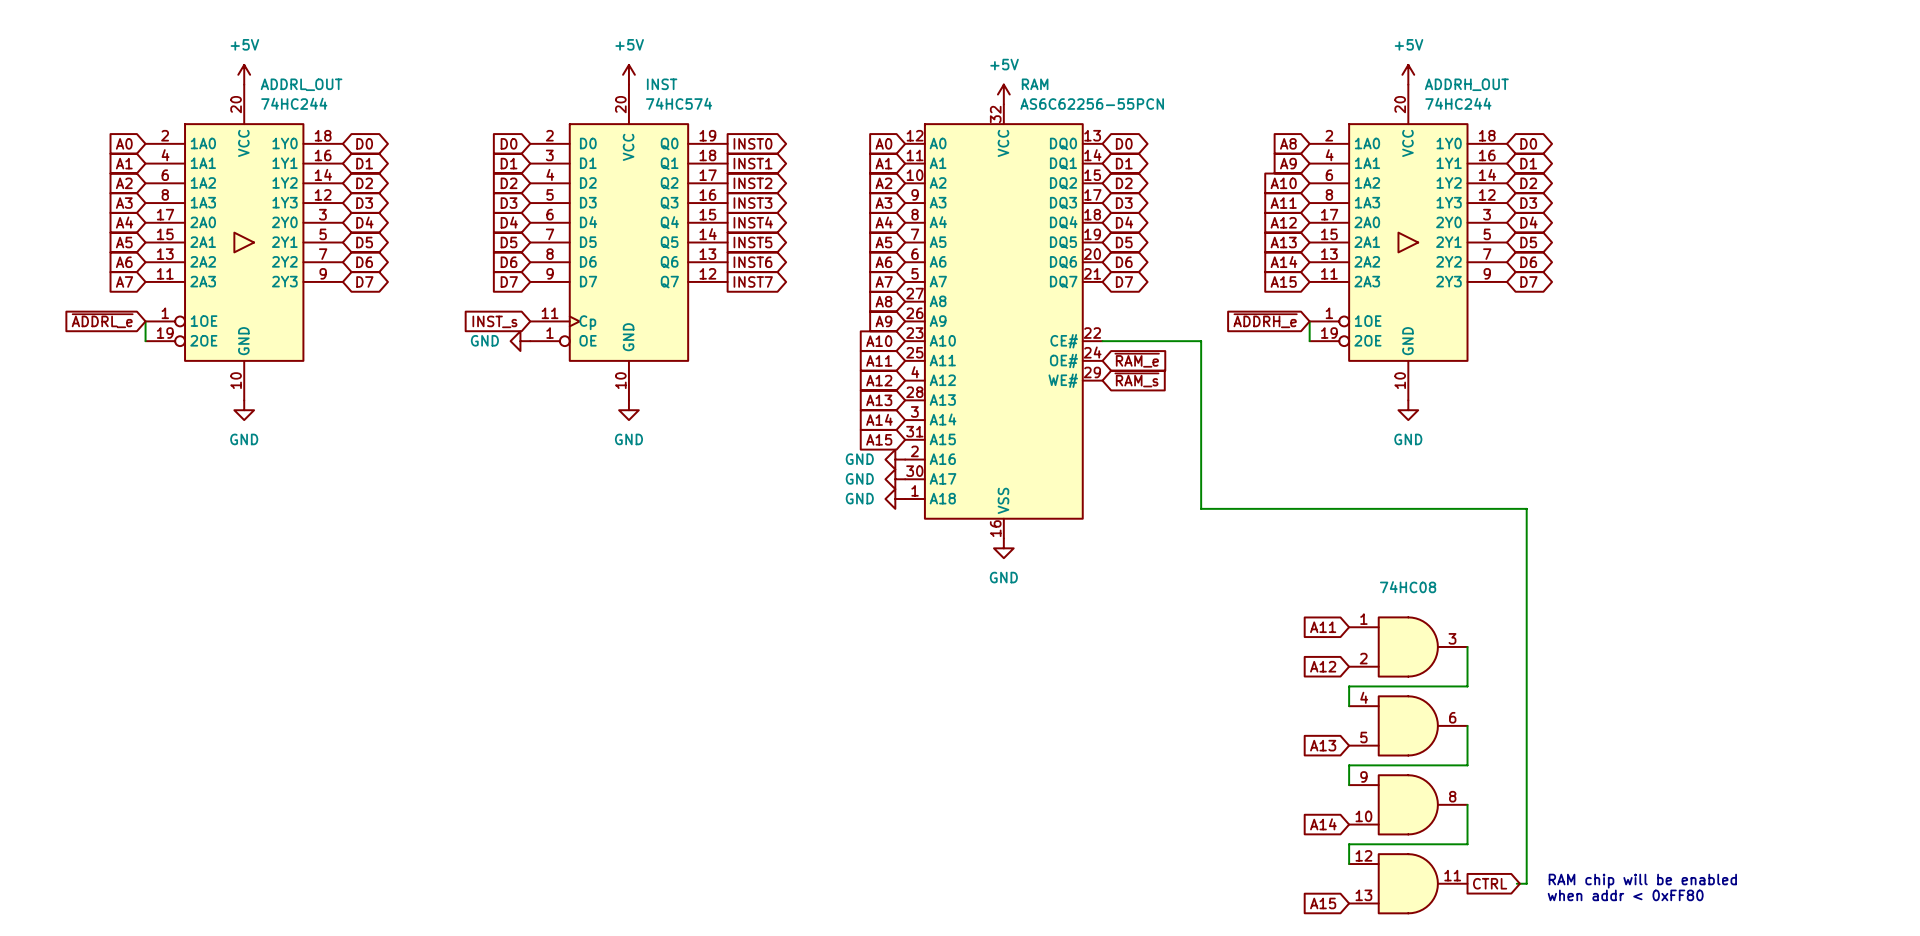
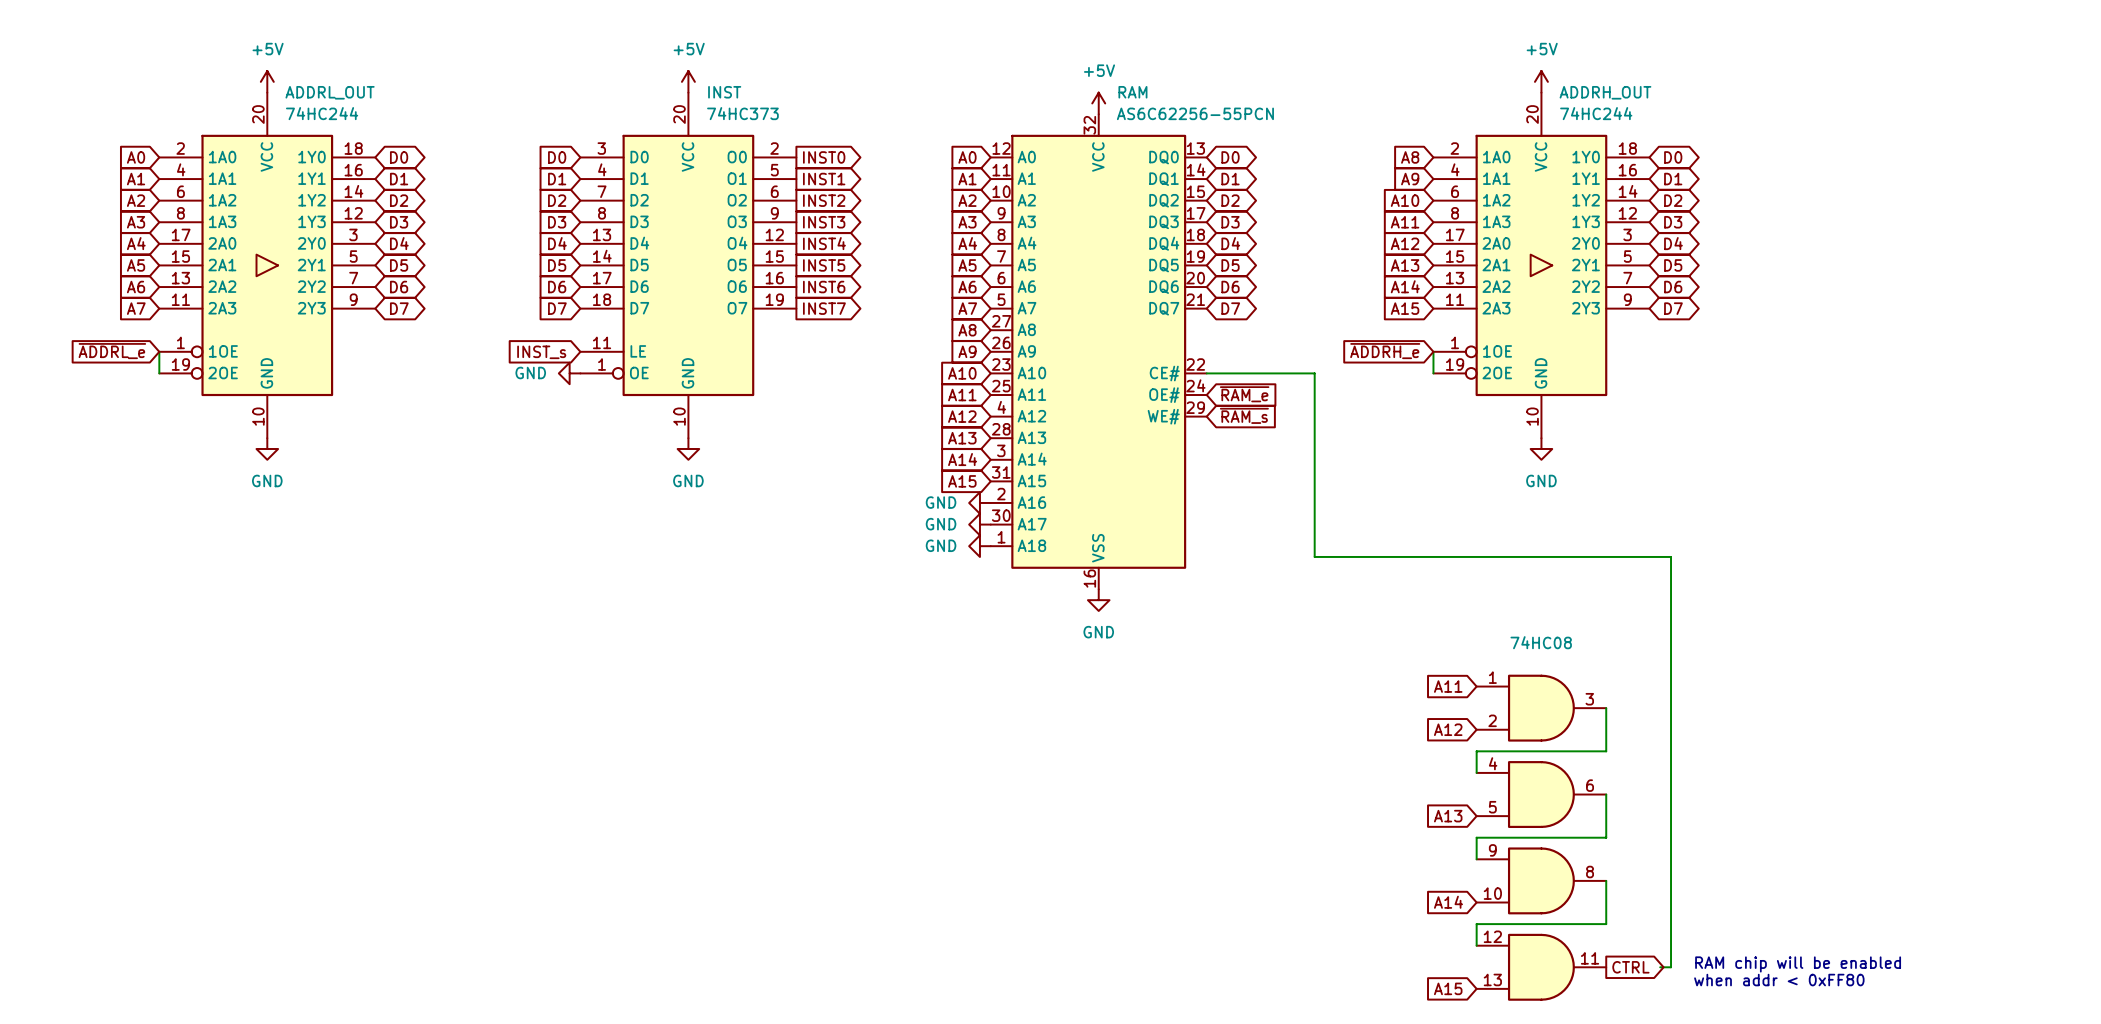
INST symbol: [530, 84, 728, 401] -> [580, 92, 797, 439]
INST value: 74HC574 (679, 103) -> 74HC373 (742, 113)

